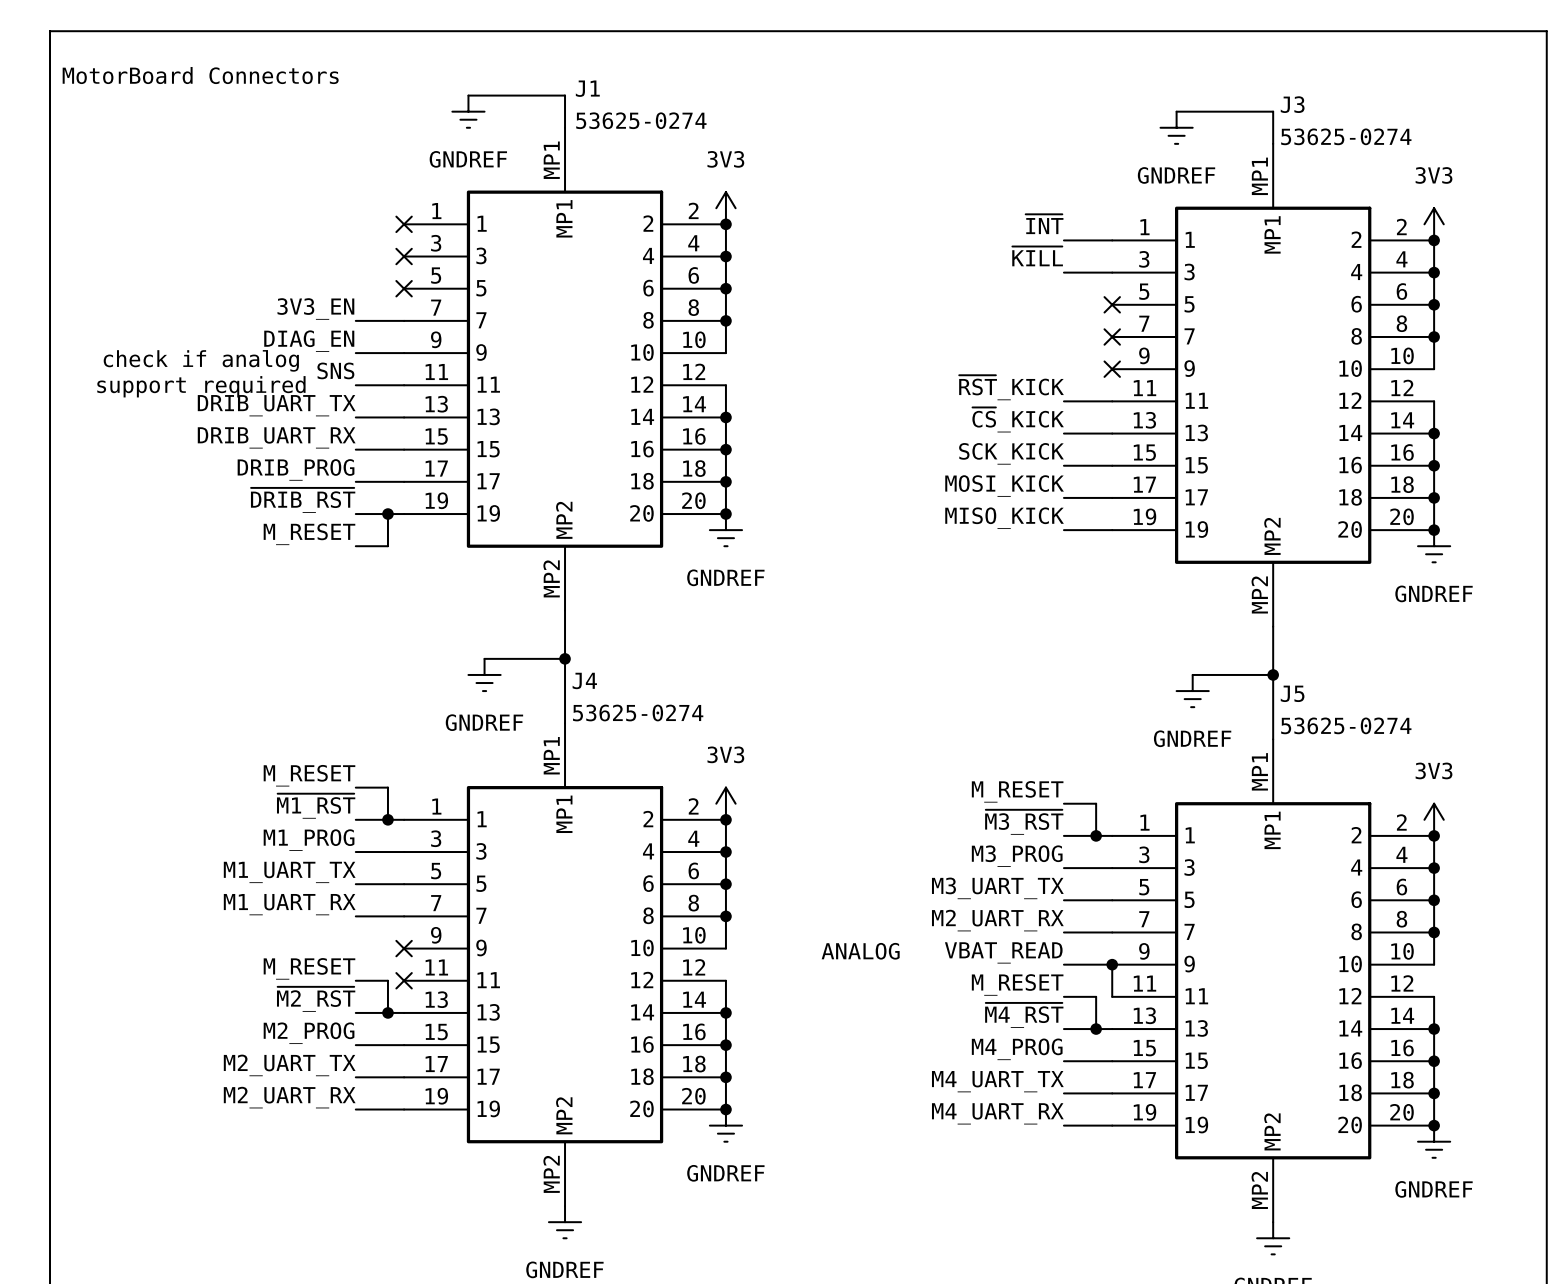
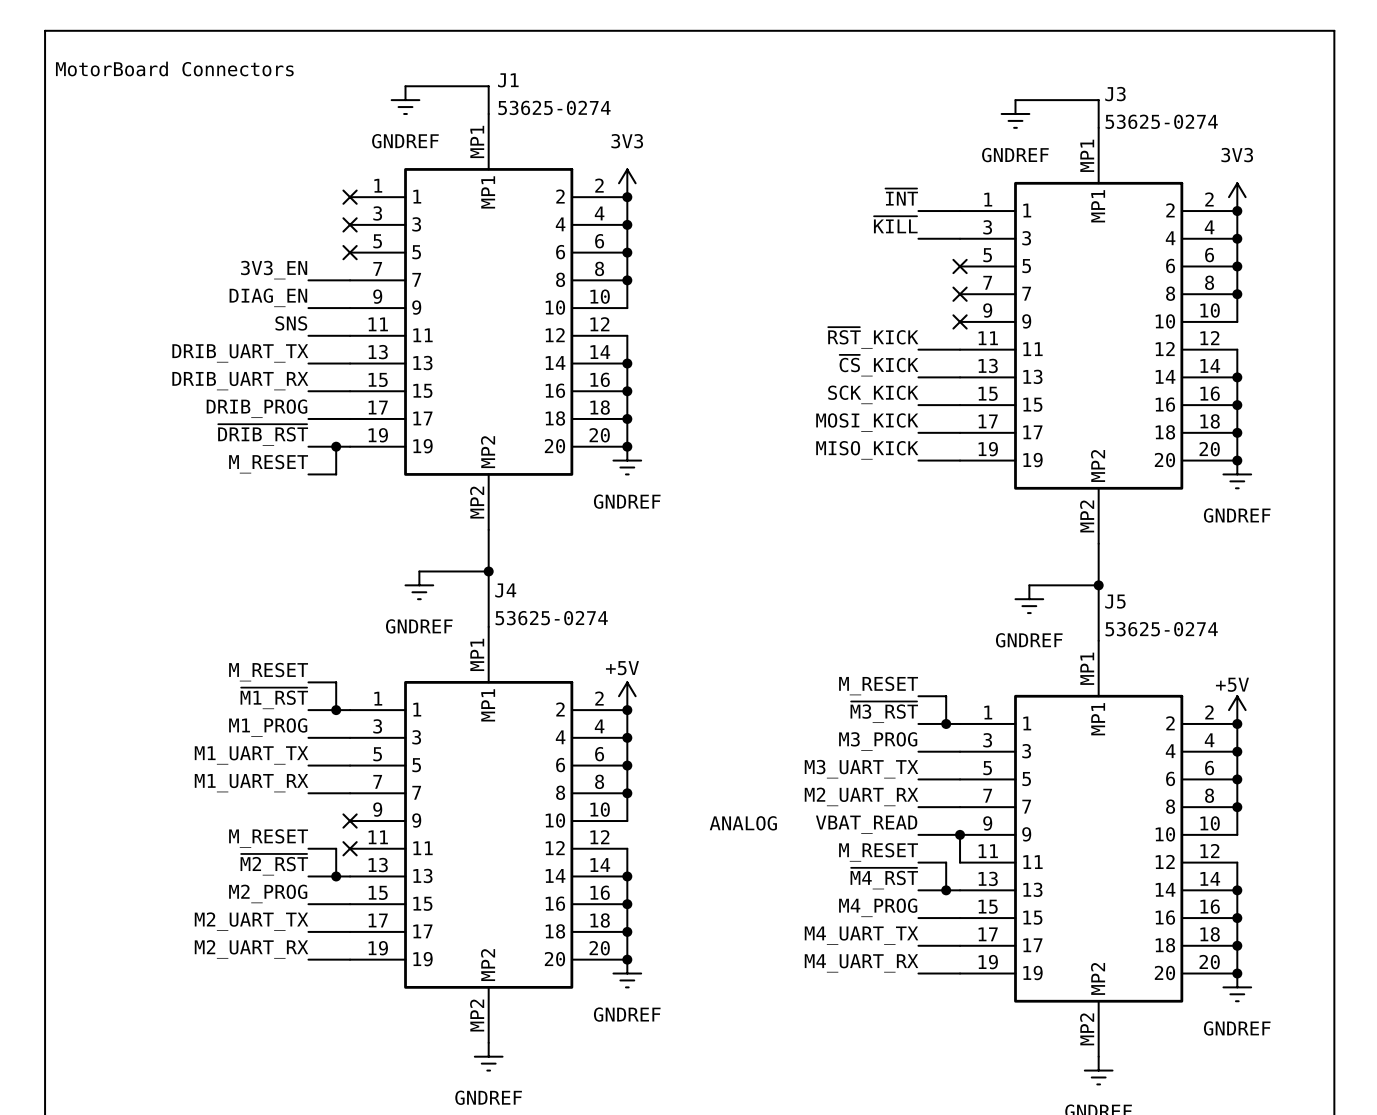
text: check if analog (201, 360) -> none
text: support required (201, 386) -> none
power symbol: 3V3 (725, 803) -> +5V (627, 696)
power symbol: 3V3 (1434, 819) -> +5V (1237, 710)

